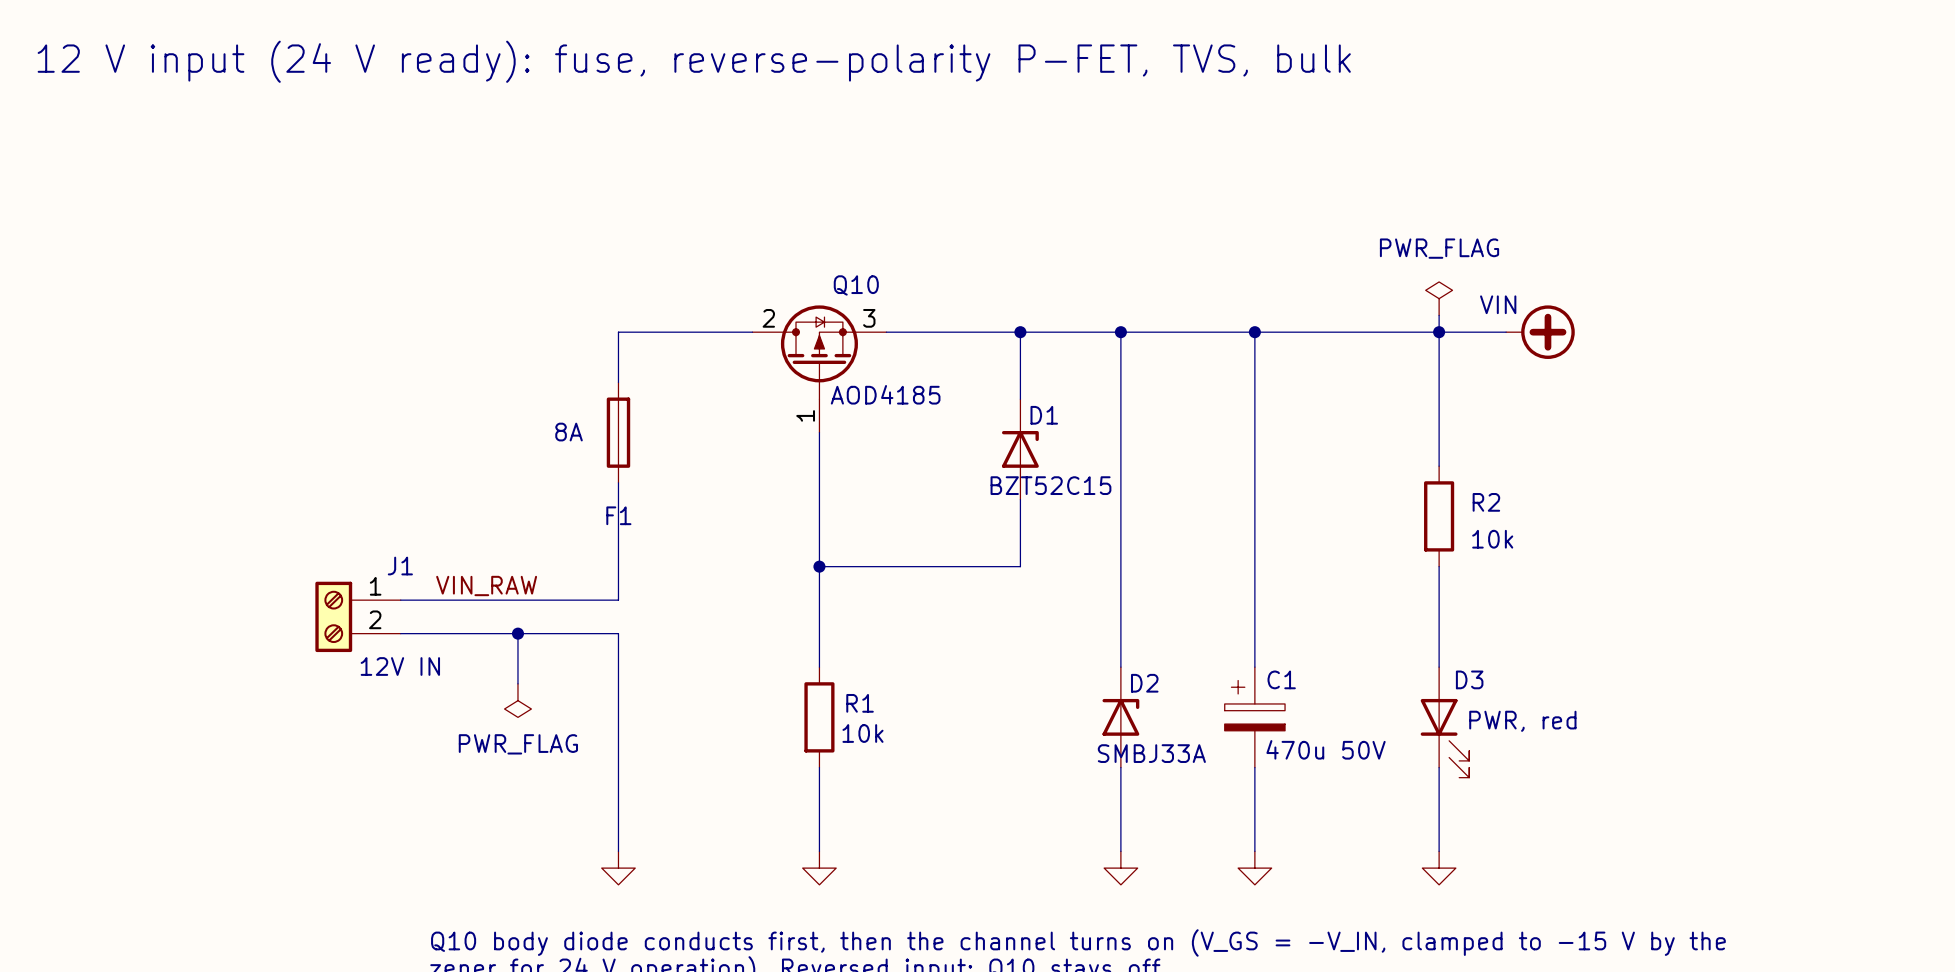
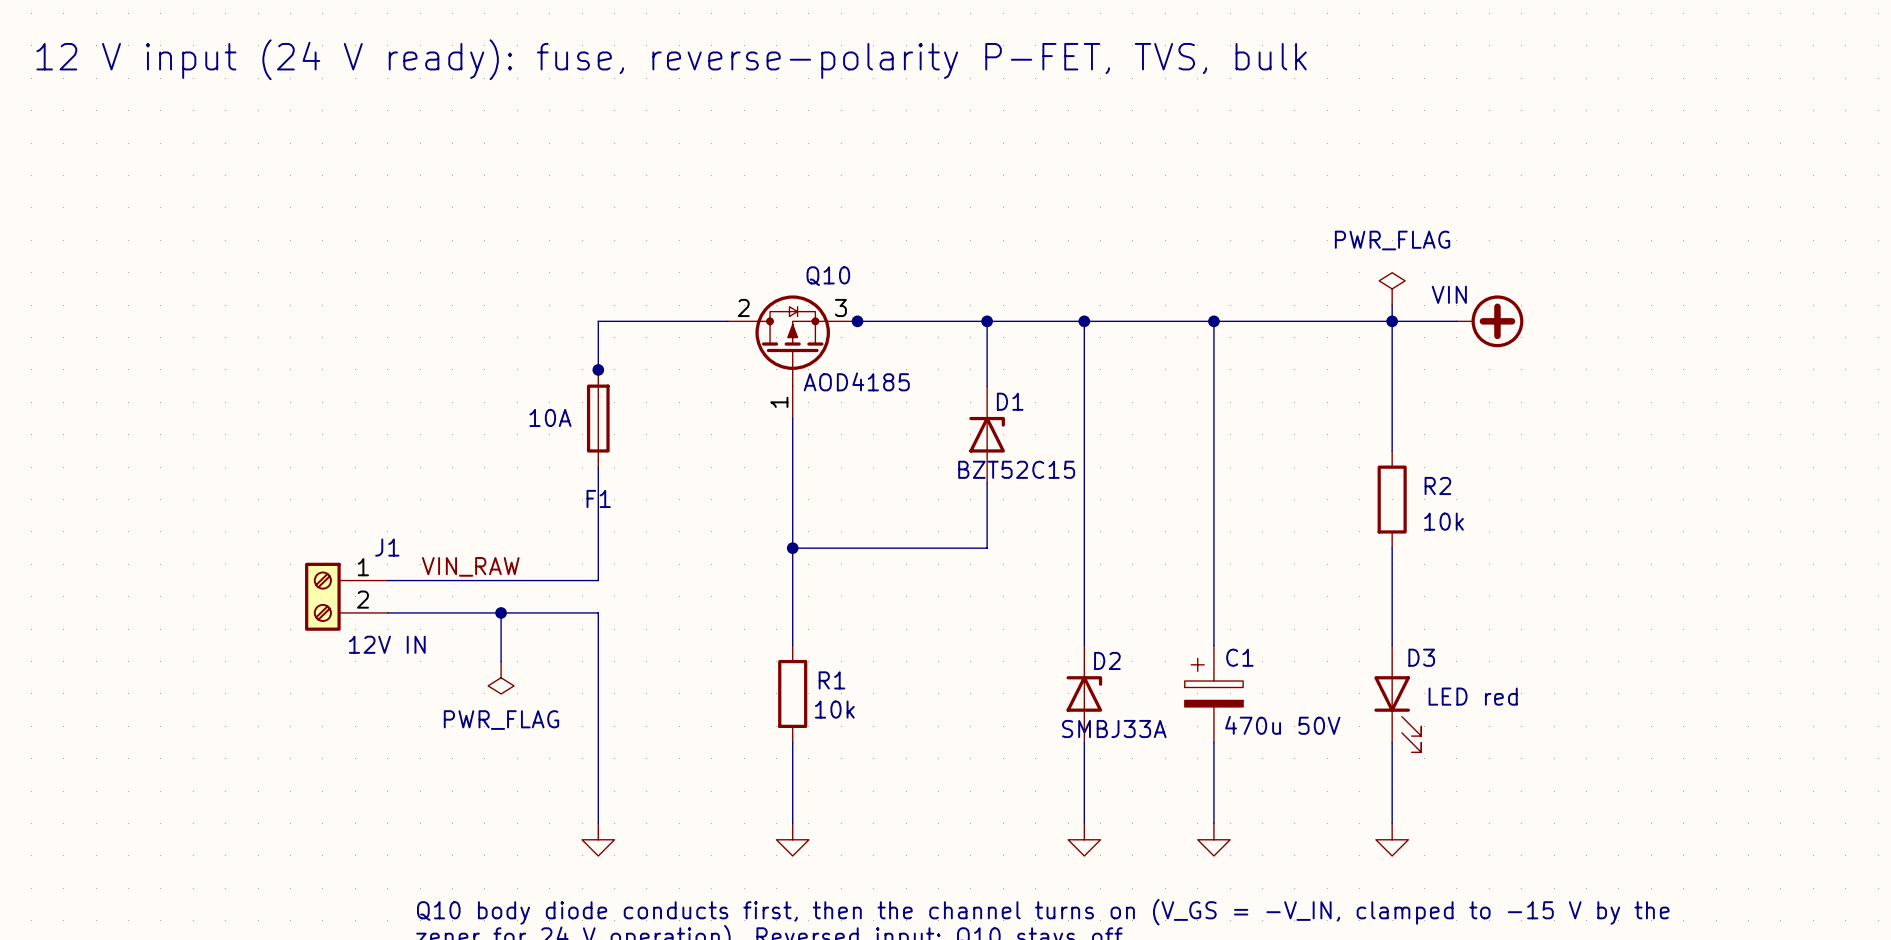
junction: none -> (857, 321)
junction: none -> (598, 369)
F1 value: 8A (569, 432) -> 10A (550, 417)
D3 value: PWR, red (1522, 721) -> LED red (1473, 696)

